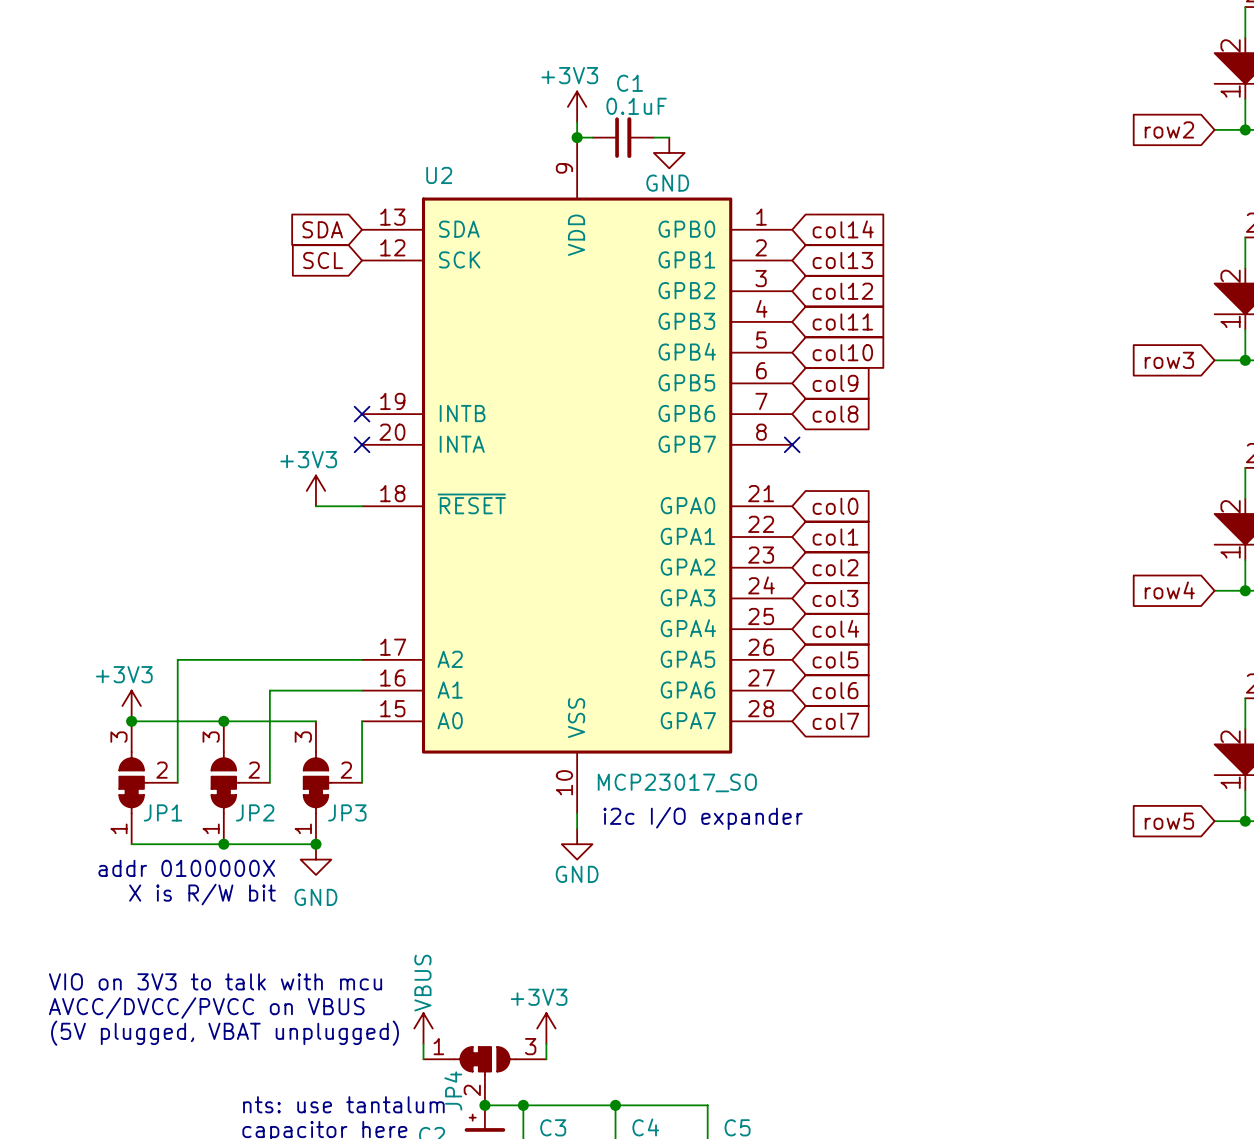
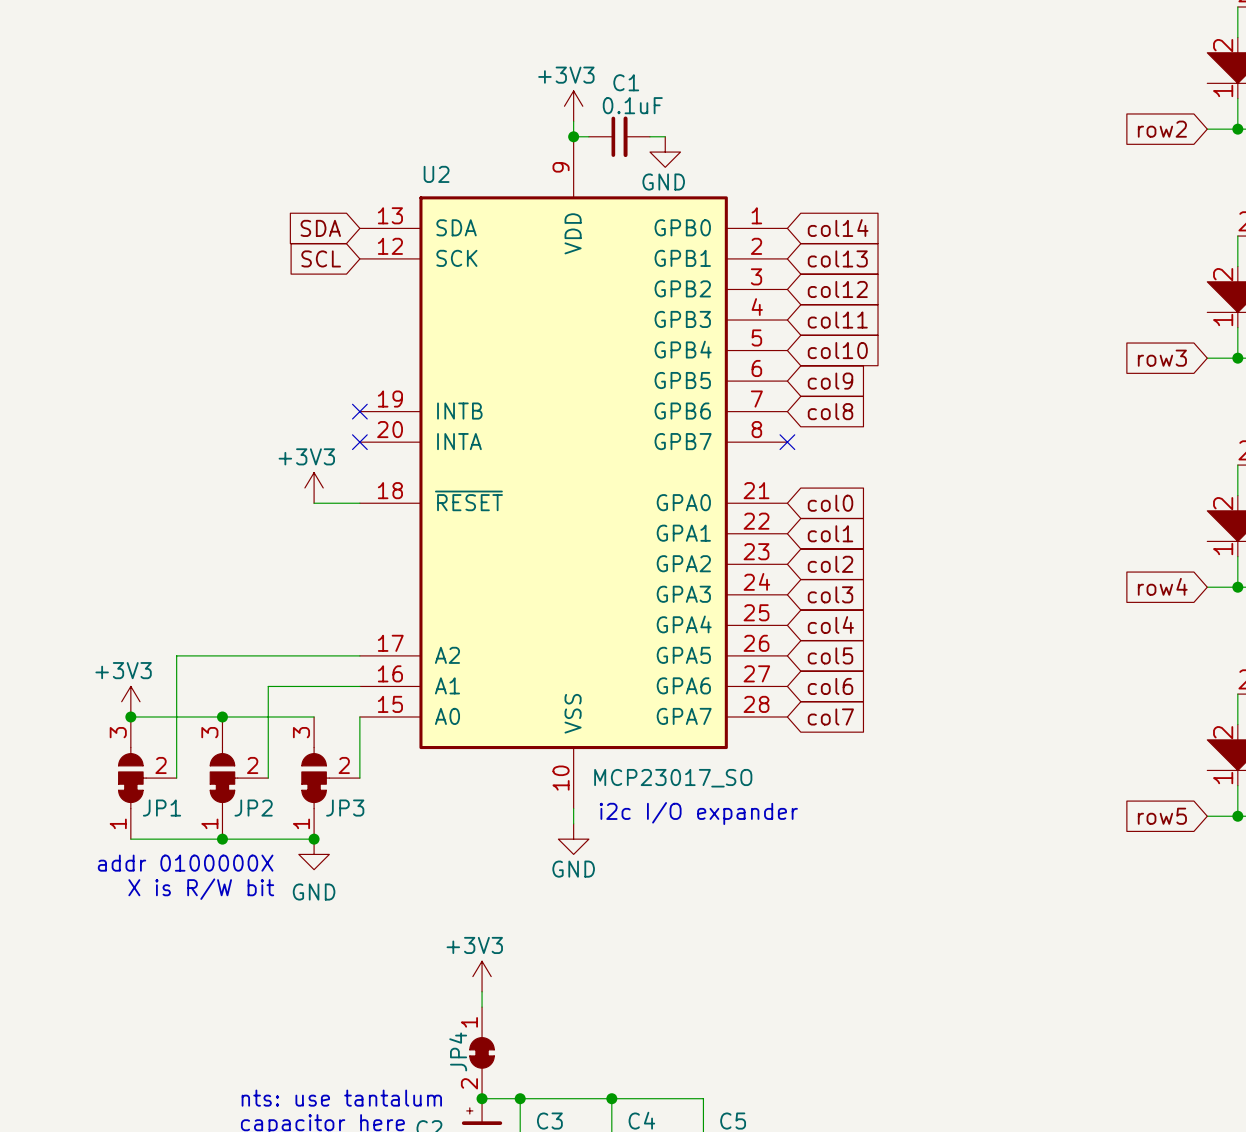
text: VIO on 3V3 to talk with mcu (215, 981) -> none
text: AVCC/DVCC/PVCC on VBUS (206, 1008) -> none
power symbol: VBUS (423, 1028) -> none
power symbol position: +3V3 (546, 1028) -> +3V3 (482, 976)
text: (5V plugged, VBAT unplugged) (225, 1033) -> none
wire: (423, 1043) (423, 1059) -> (482, 991) (482, 1007)
wire: (546, 1043) (546, 1059) -> none
JP4 symbol: [423, 1046, 547, 1106] -> [469, 1007, 495, 1099]

